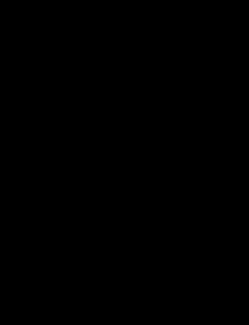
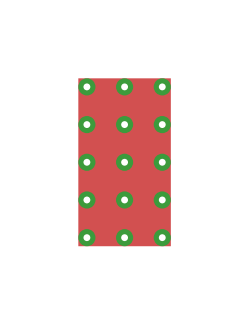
part: none -> (124, 162)

